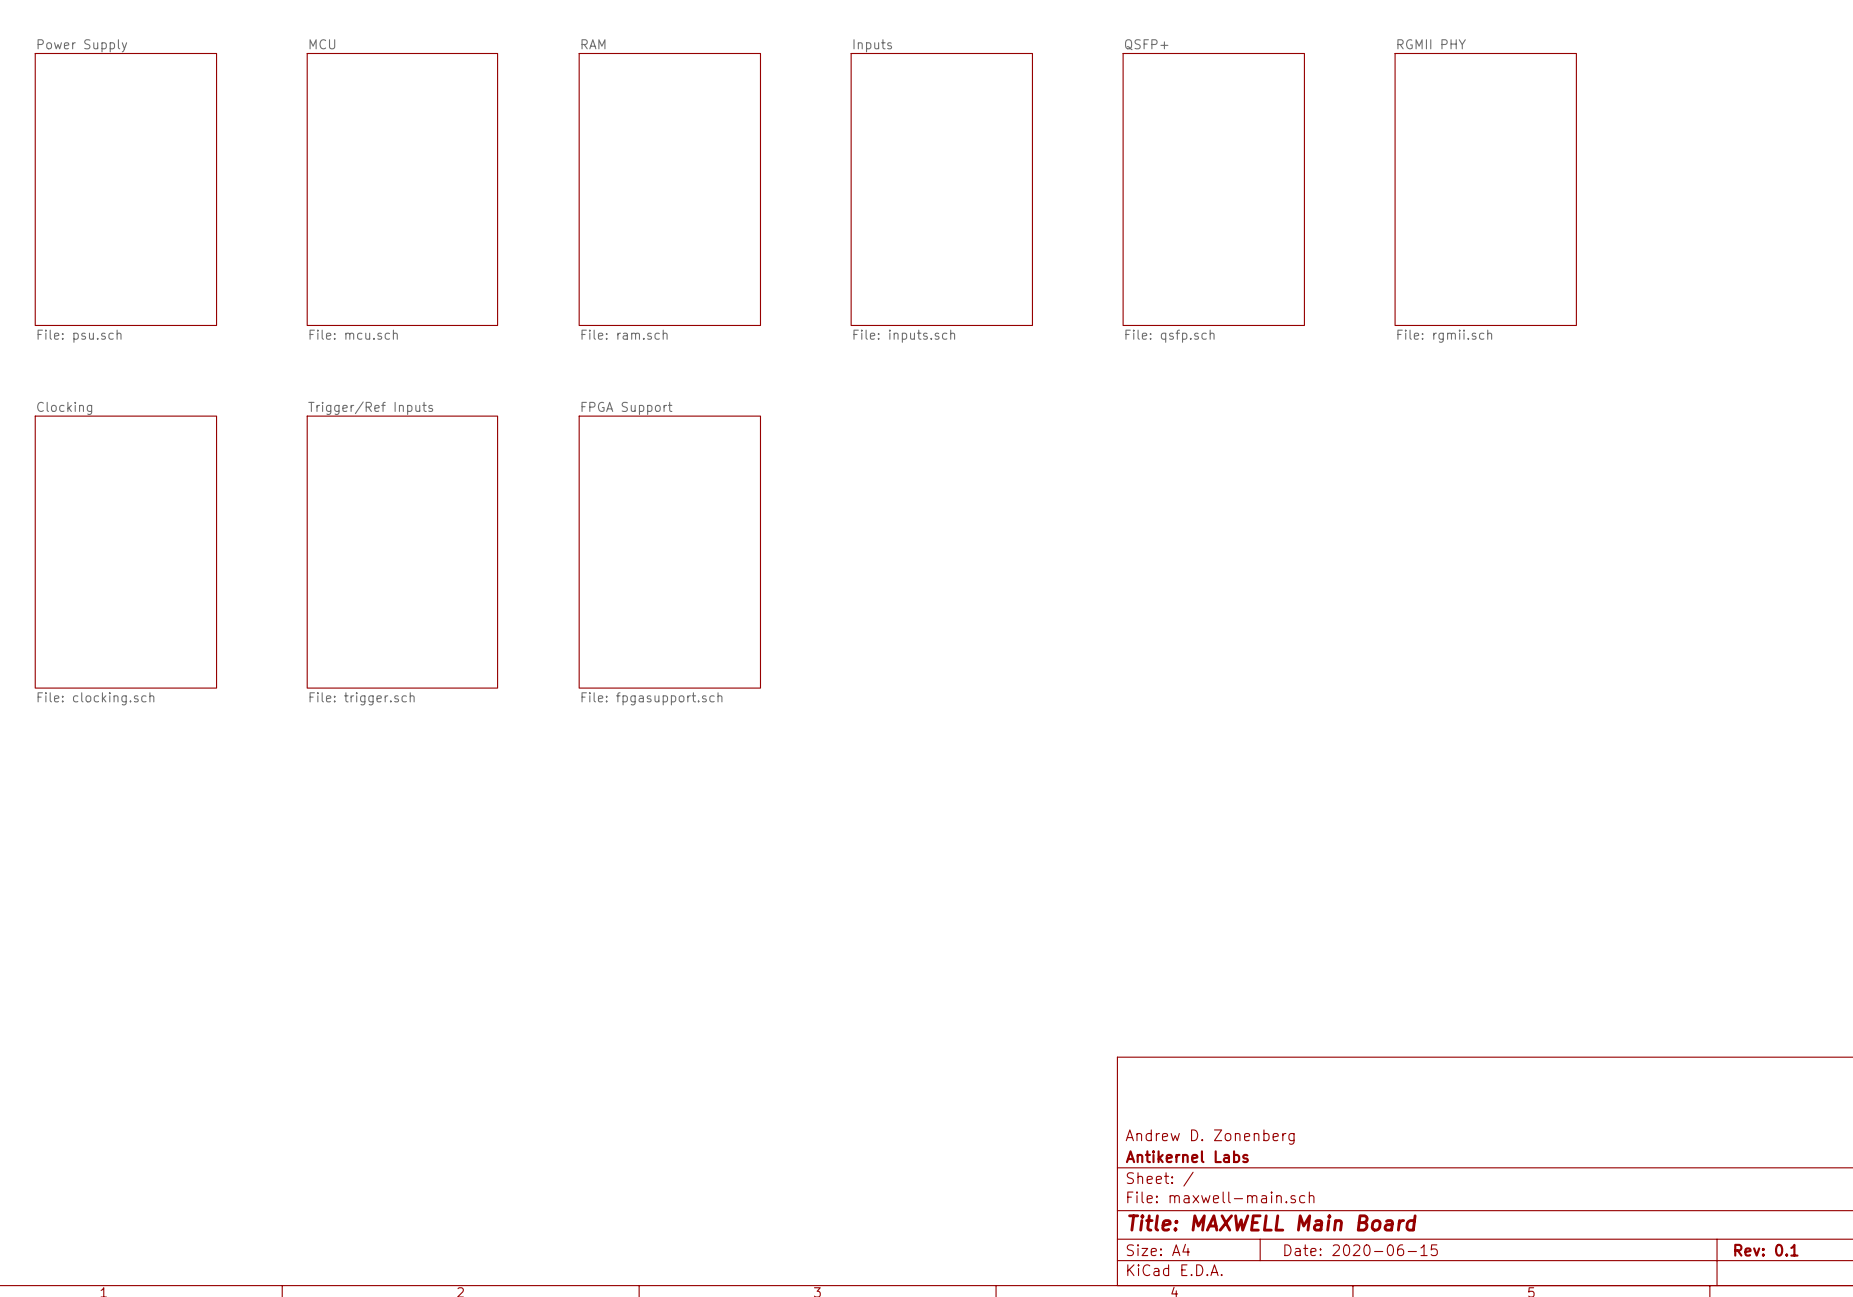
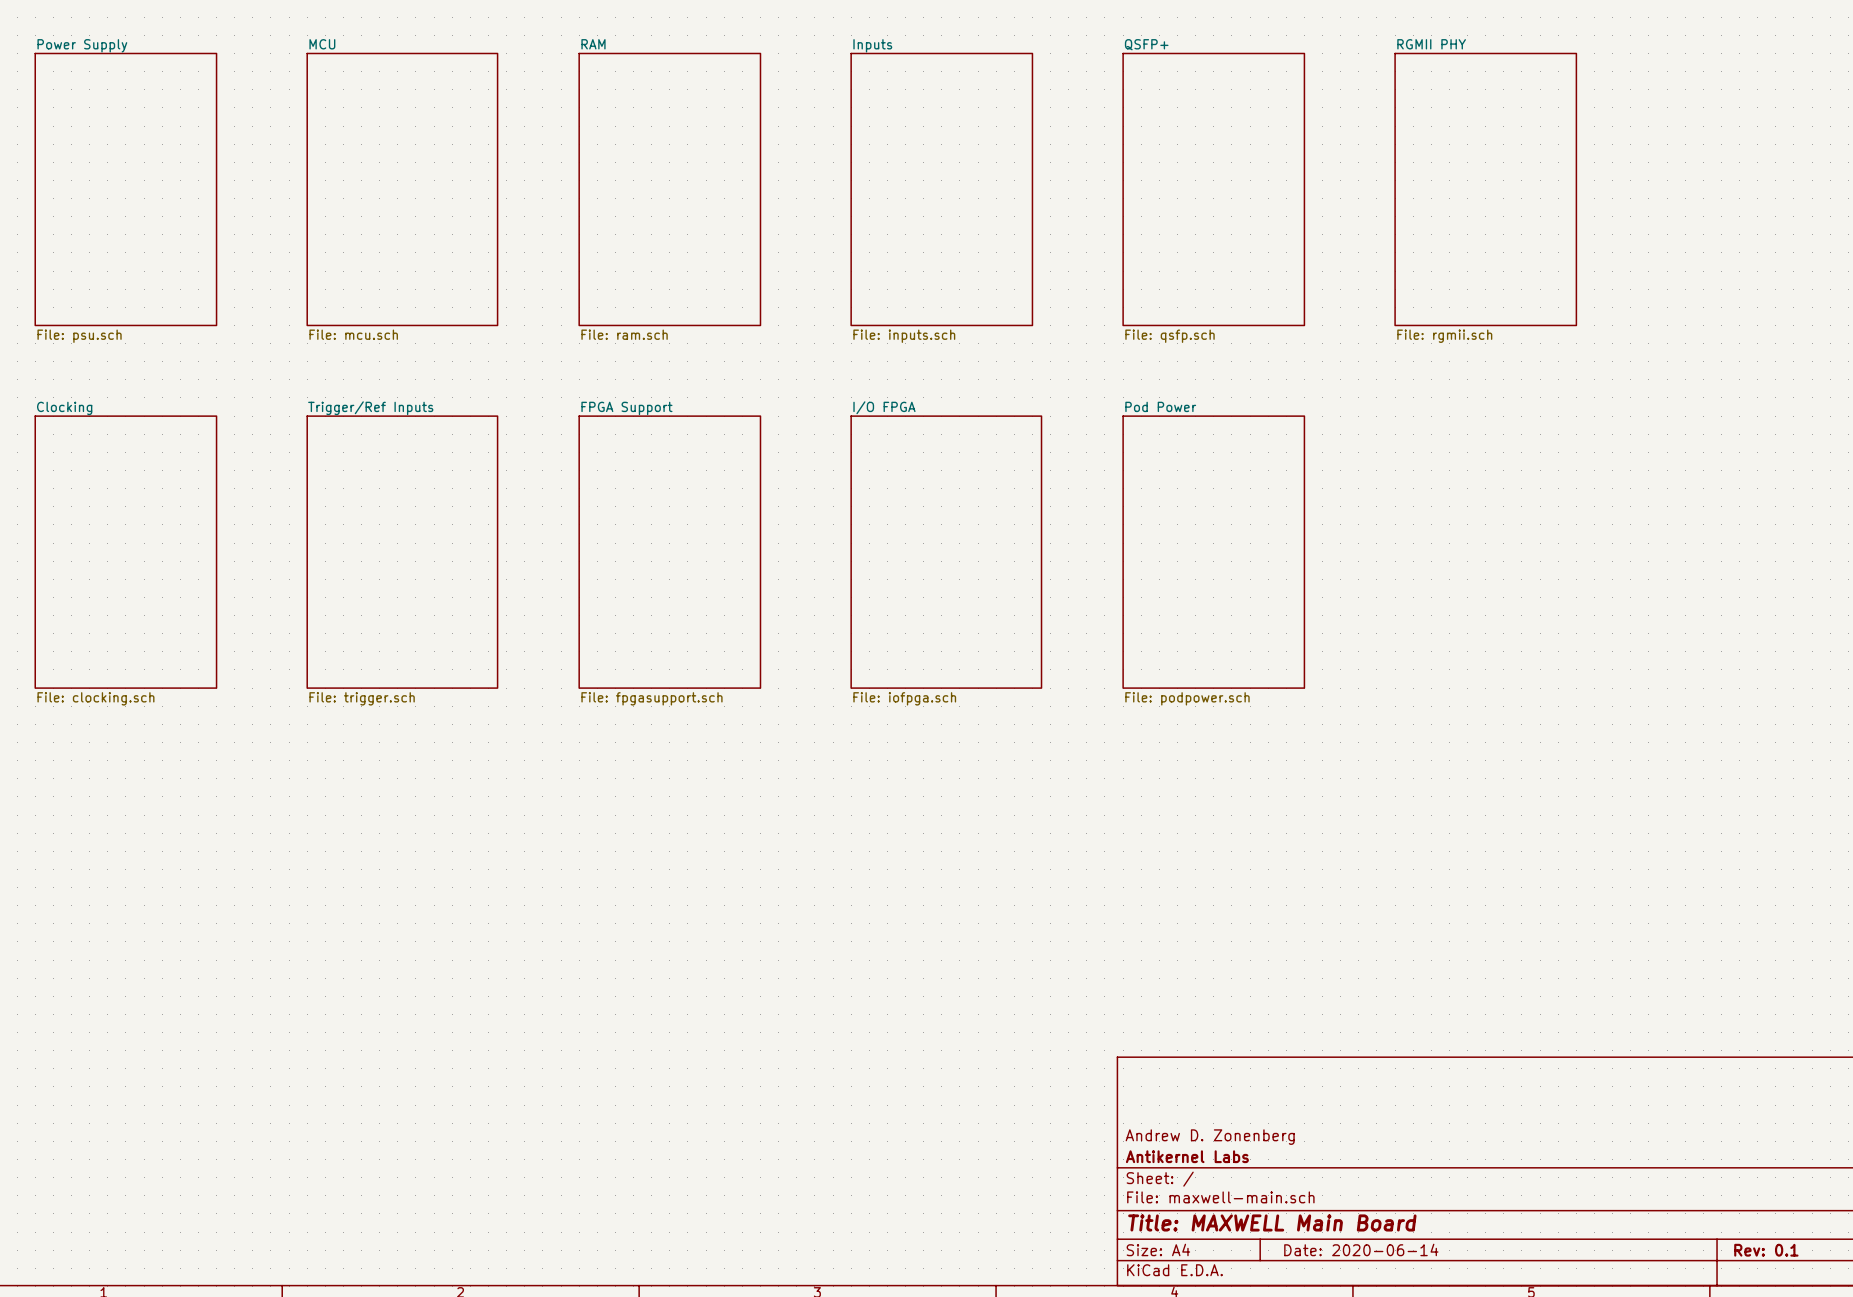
sheet I/O FPGA: none -> File: iofpga.sch (946, 552)
sheet Pod Power: none -> File: podpower.sch (1213, 552)
title block: Date: 2020-06-15 (1361, 1250) -> Date: 2020-06-14 (1361, 1249)

